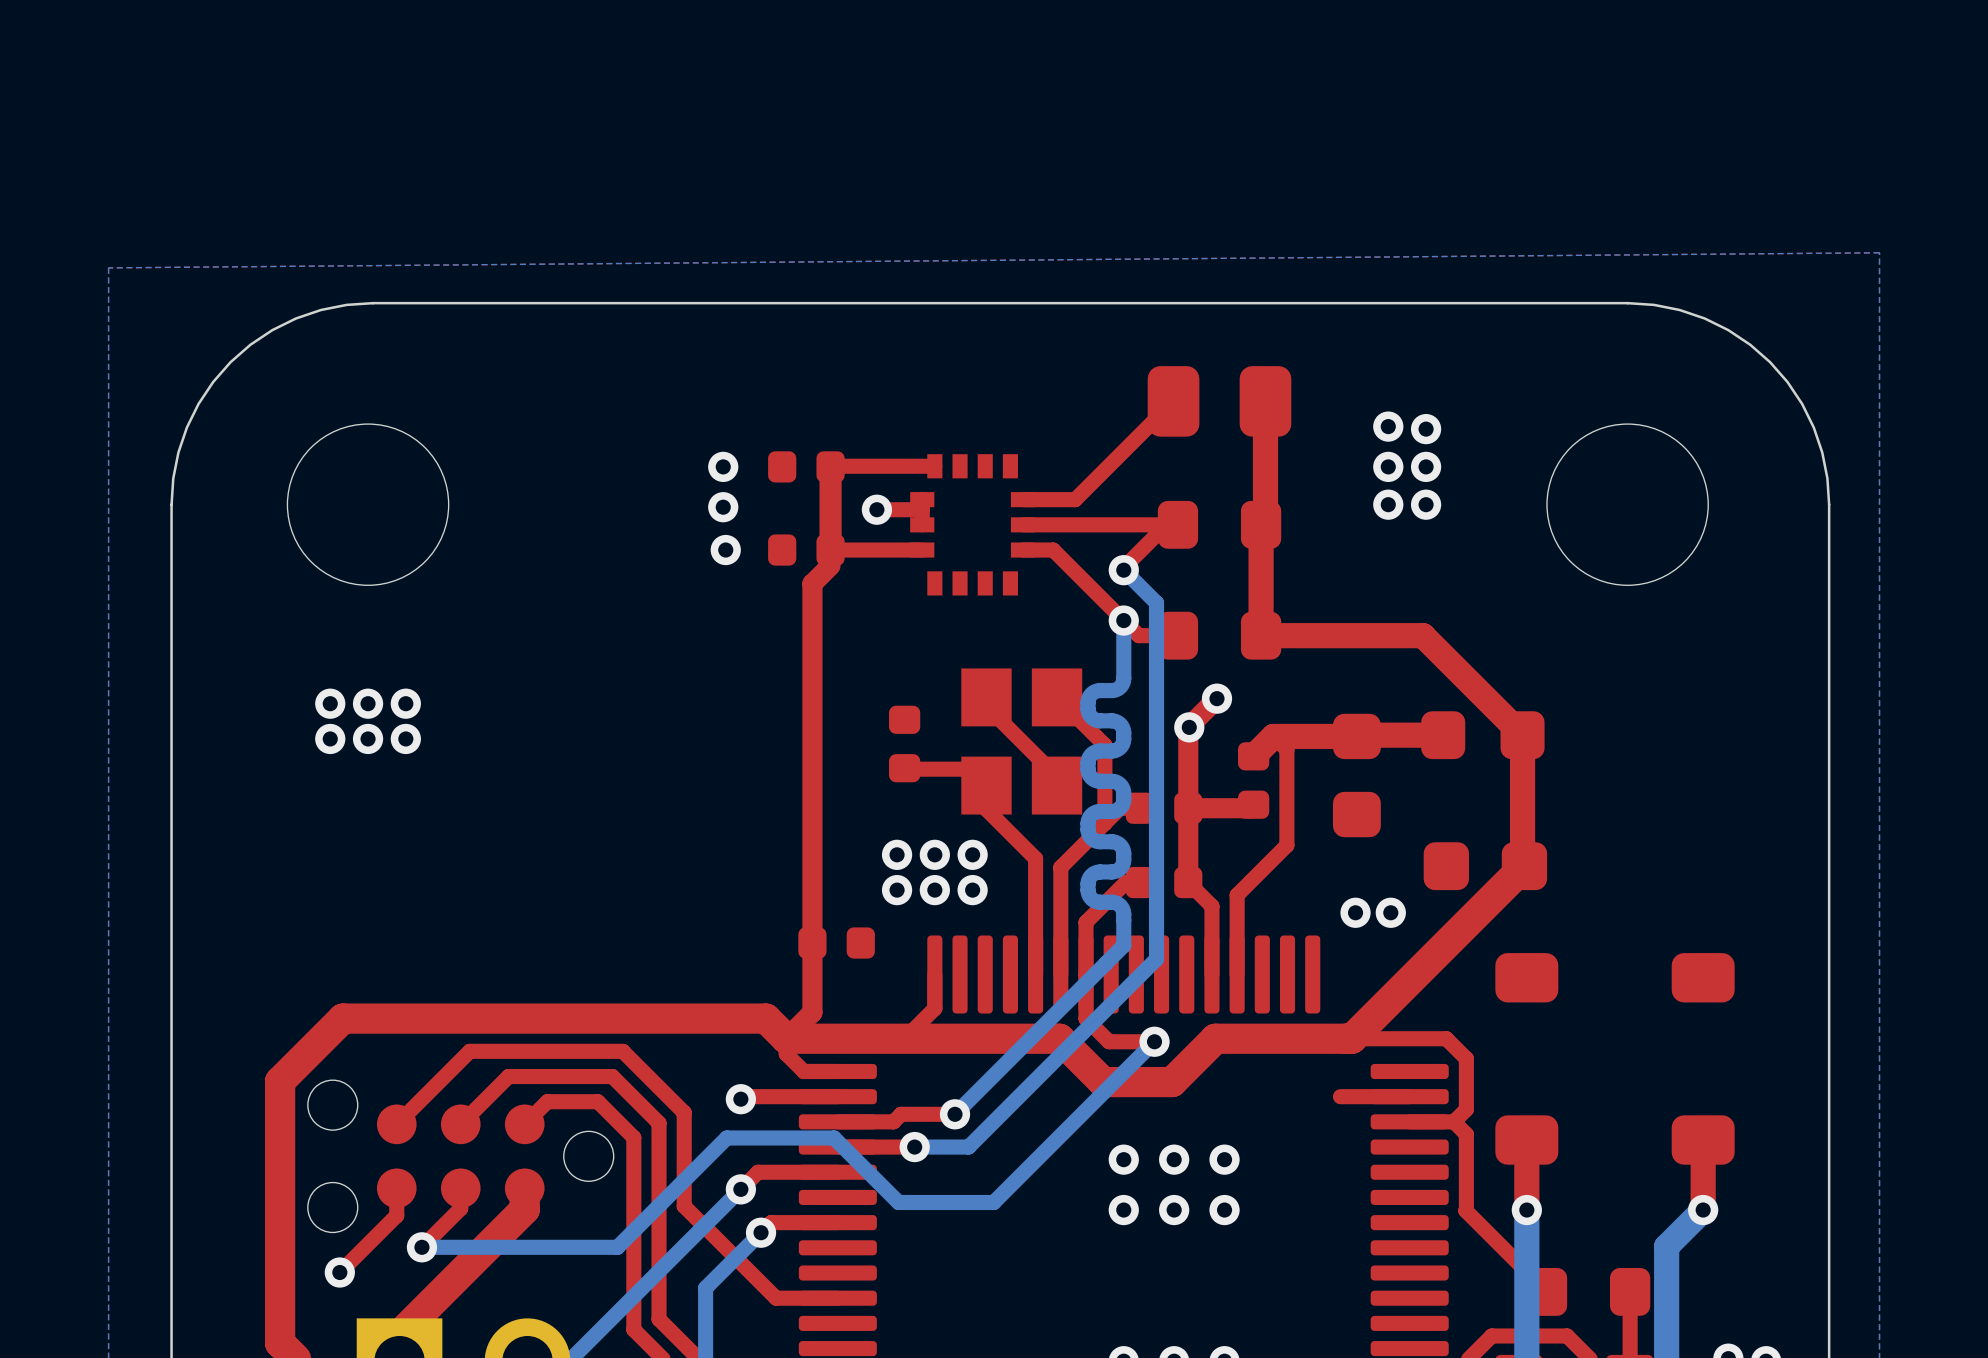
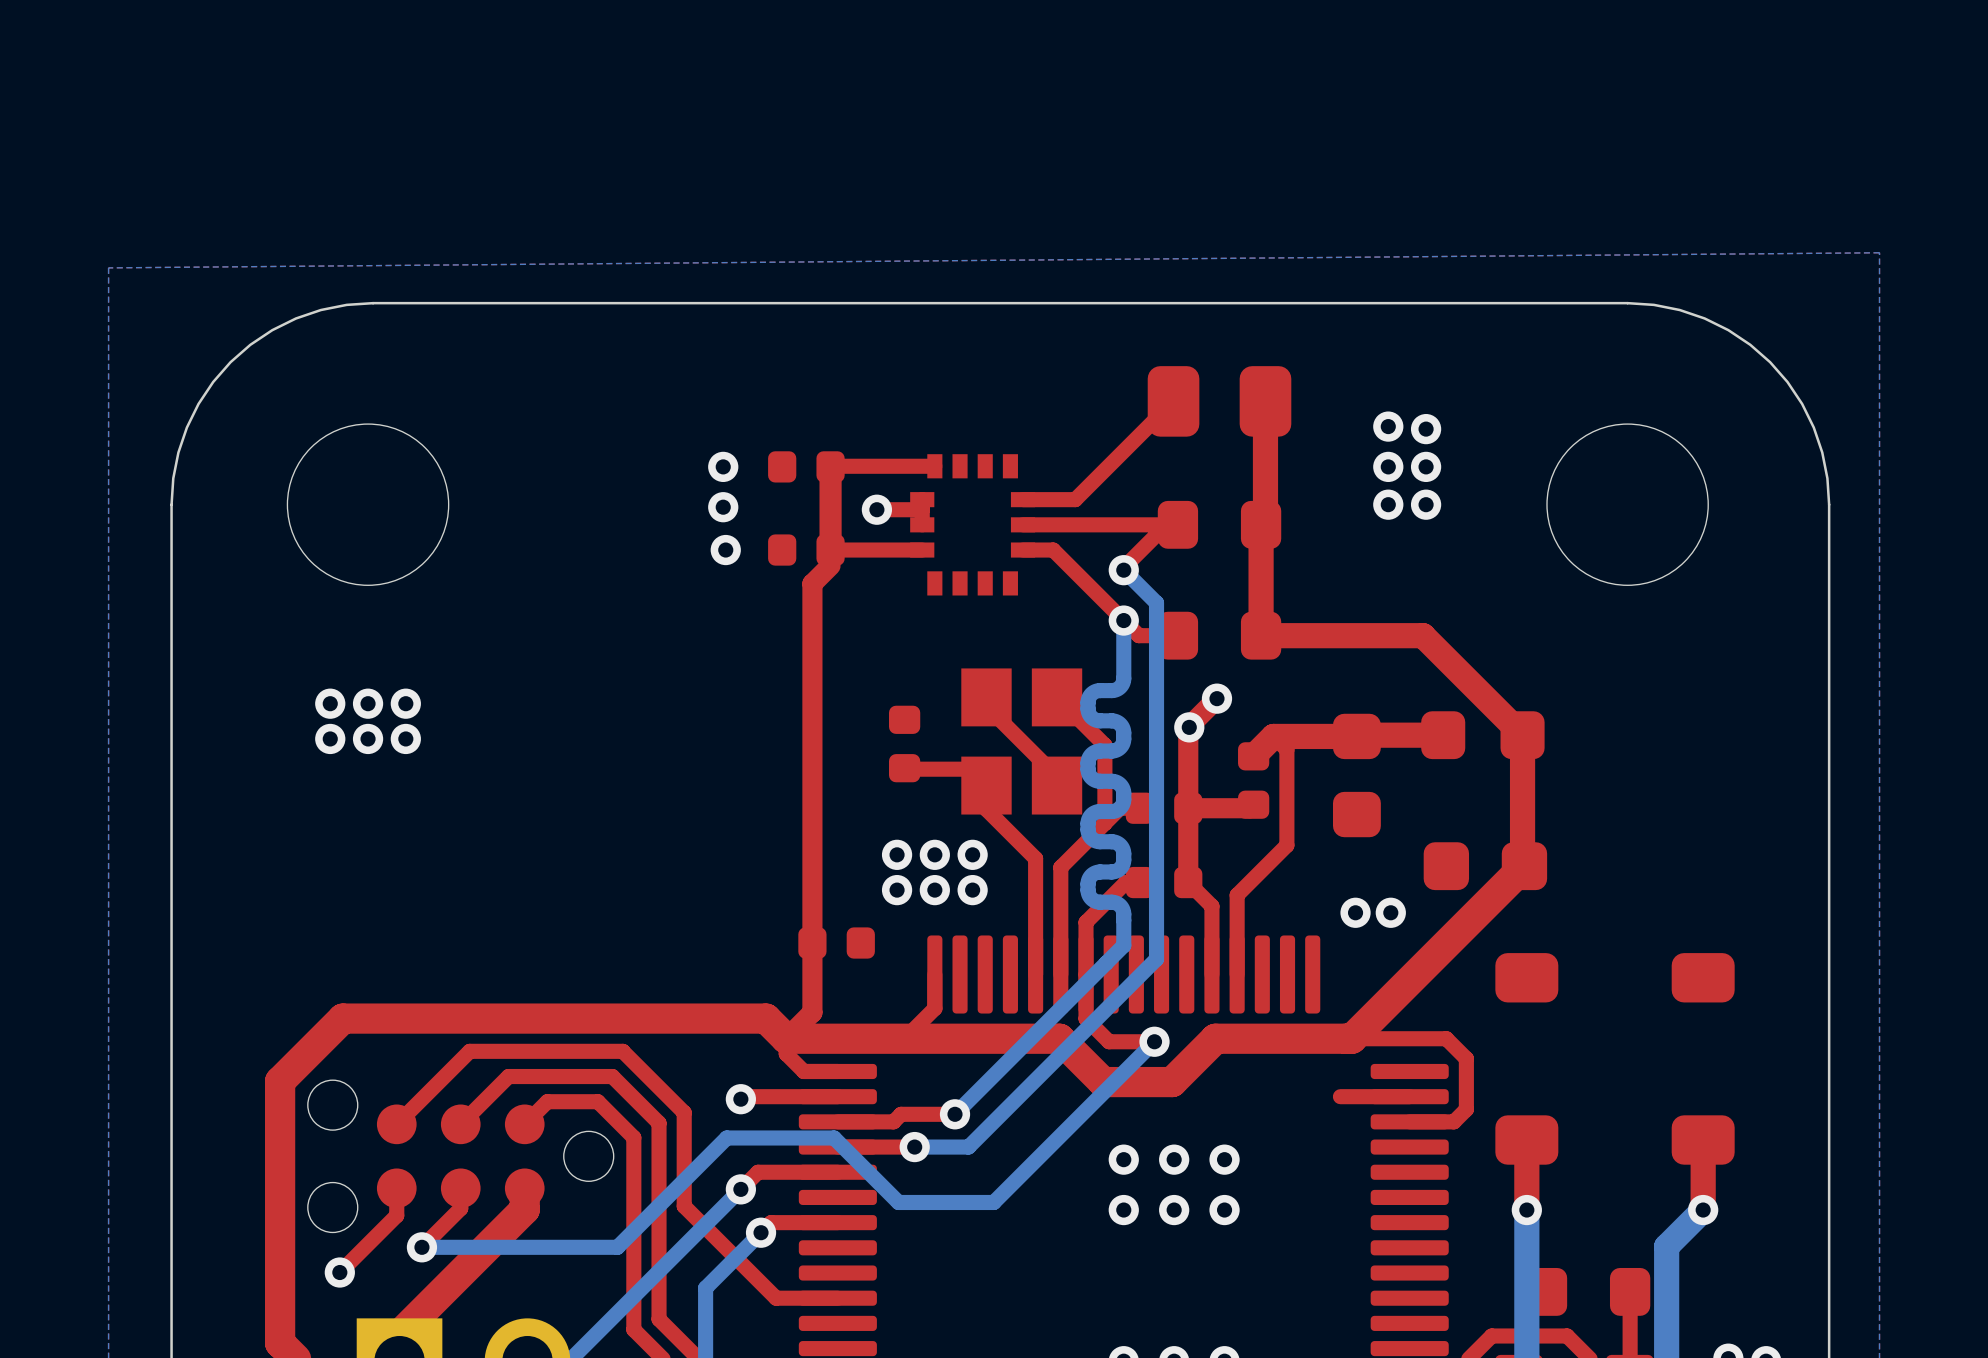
top track: (1453, 1121) (1466, 1134) (1466, 1210) -> none
top track: (1465, 1210) (1546, 1291) -> none

